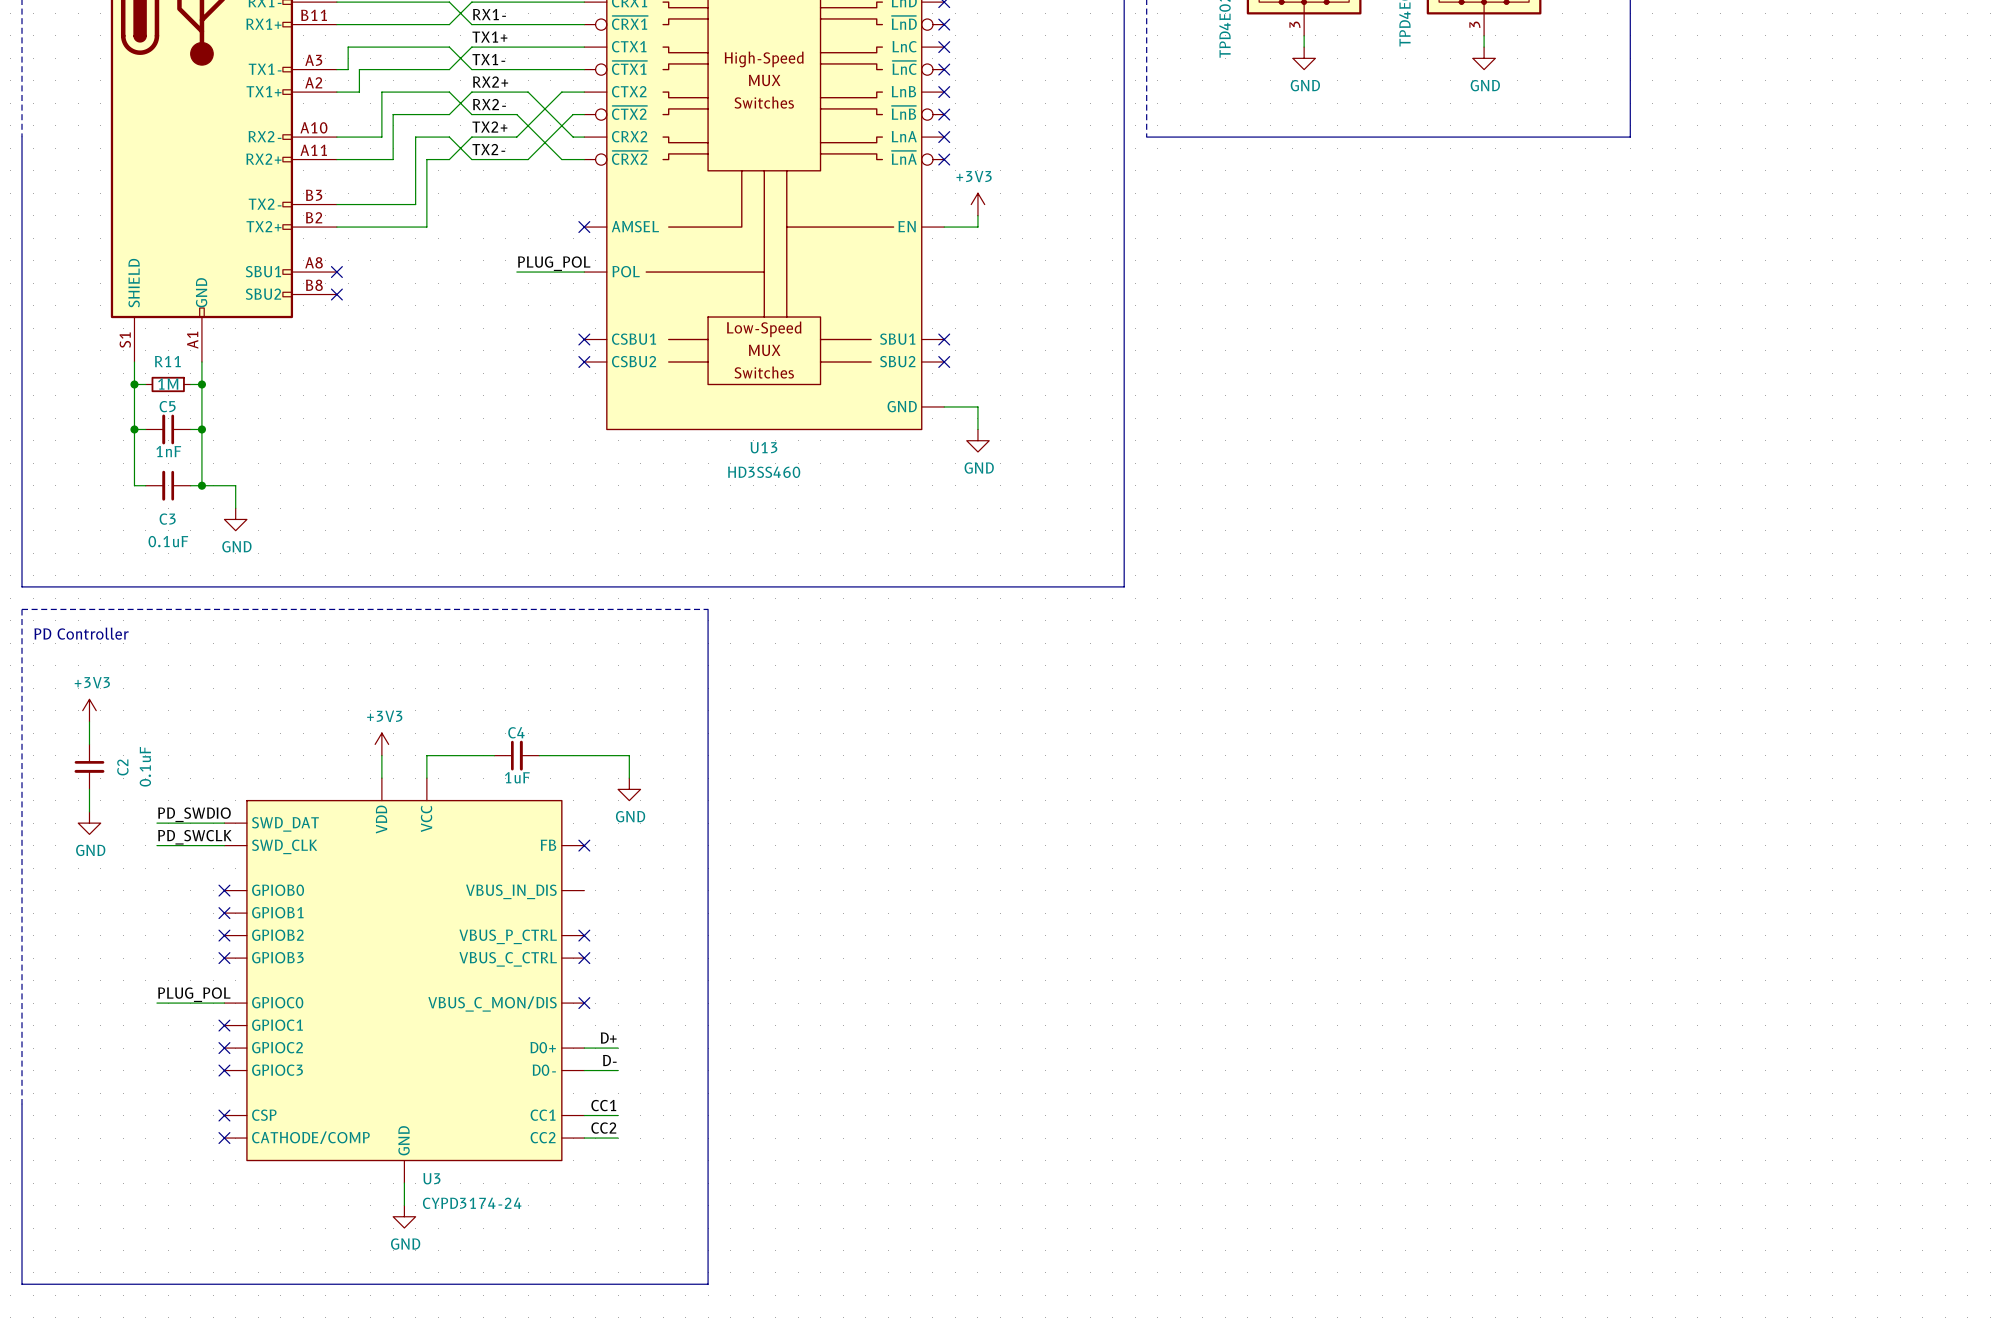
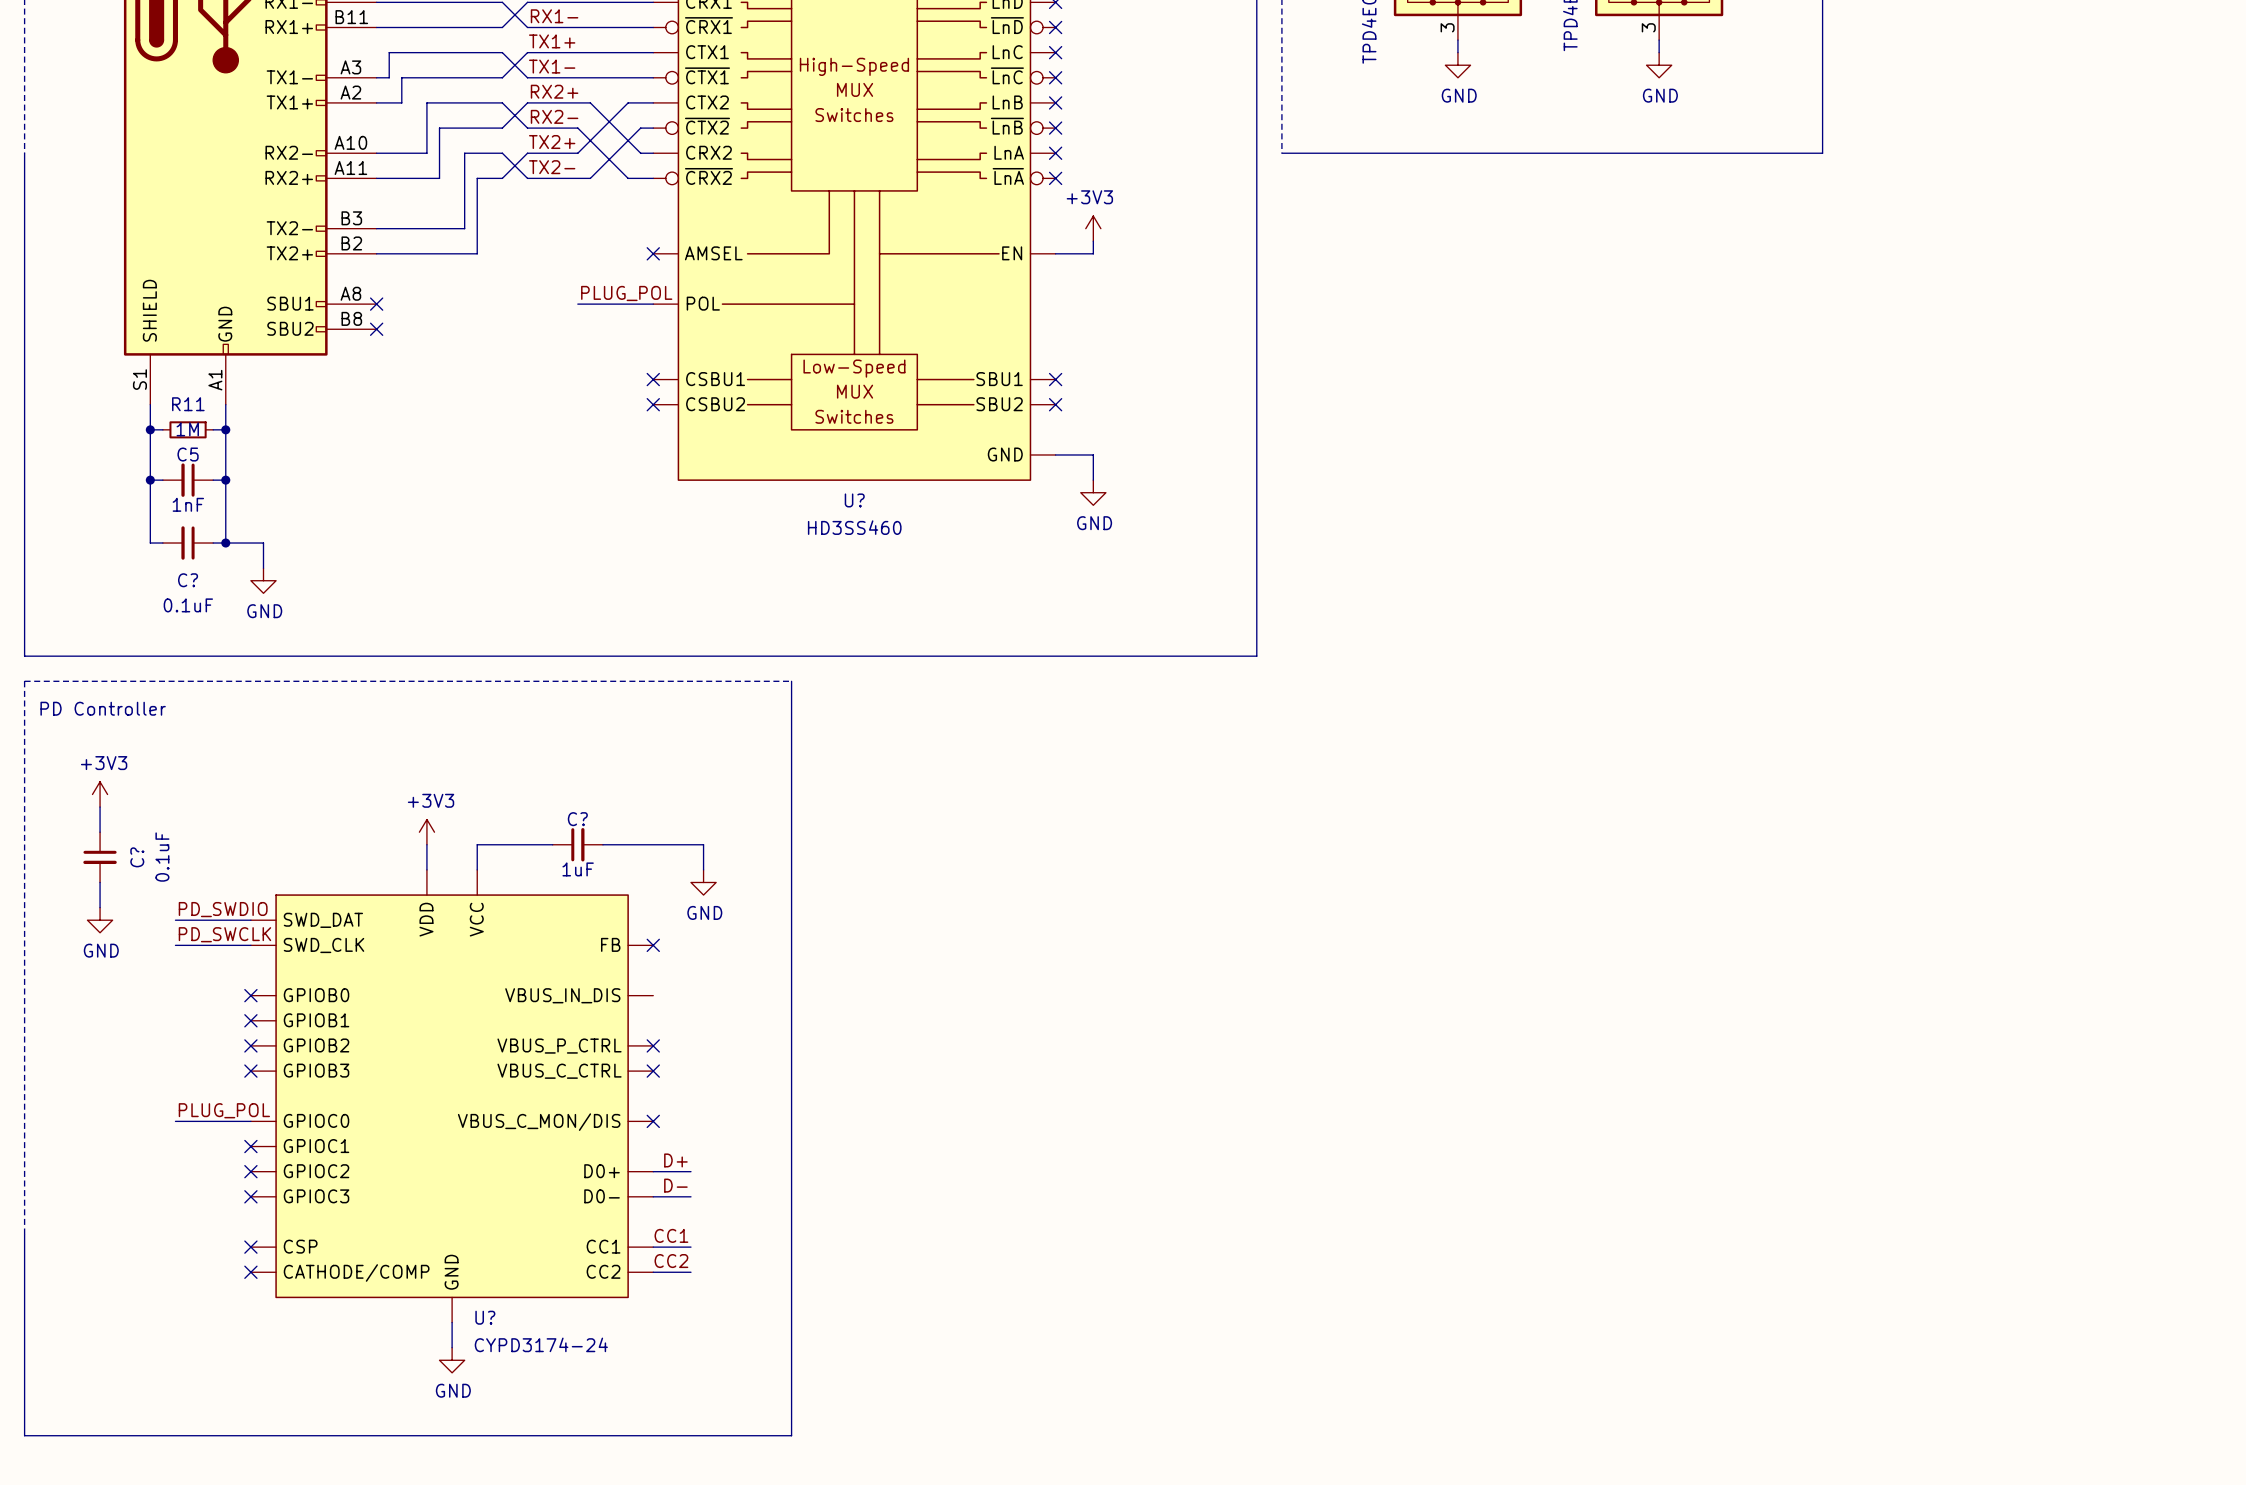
U13 name: U13 (763, 447) -> U? (854, 500)
C3 name: C3 (167, 519) -> C? (188, 580)
C4 name: C4 (516, 732) -> C? (577, 819)
C2 name: C2 (122, 767) -> C? (137, 857)
U3 name: U3 (431, 1178) -> U? (485, 1317)

